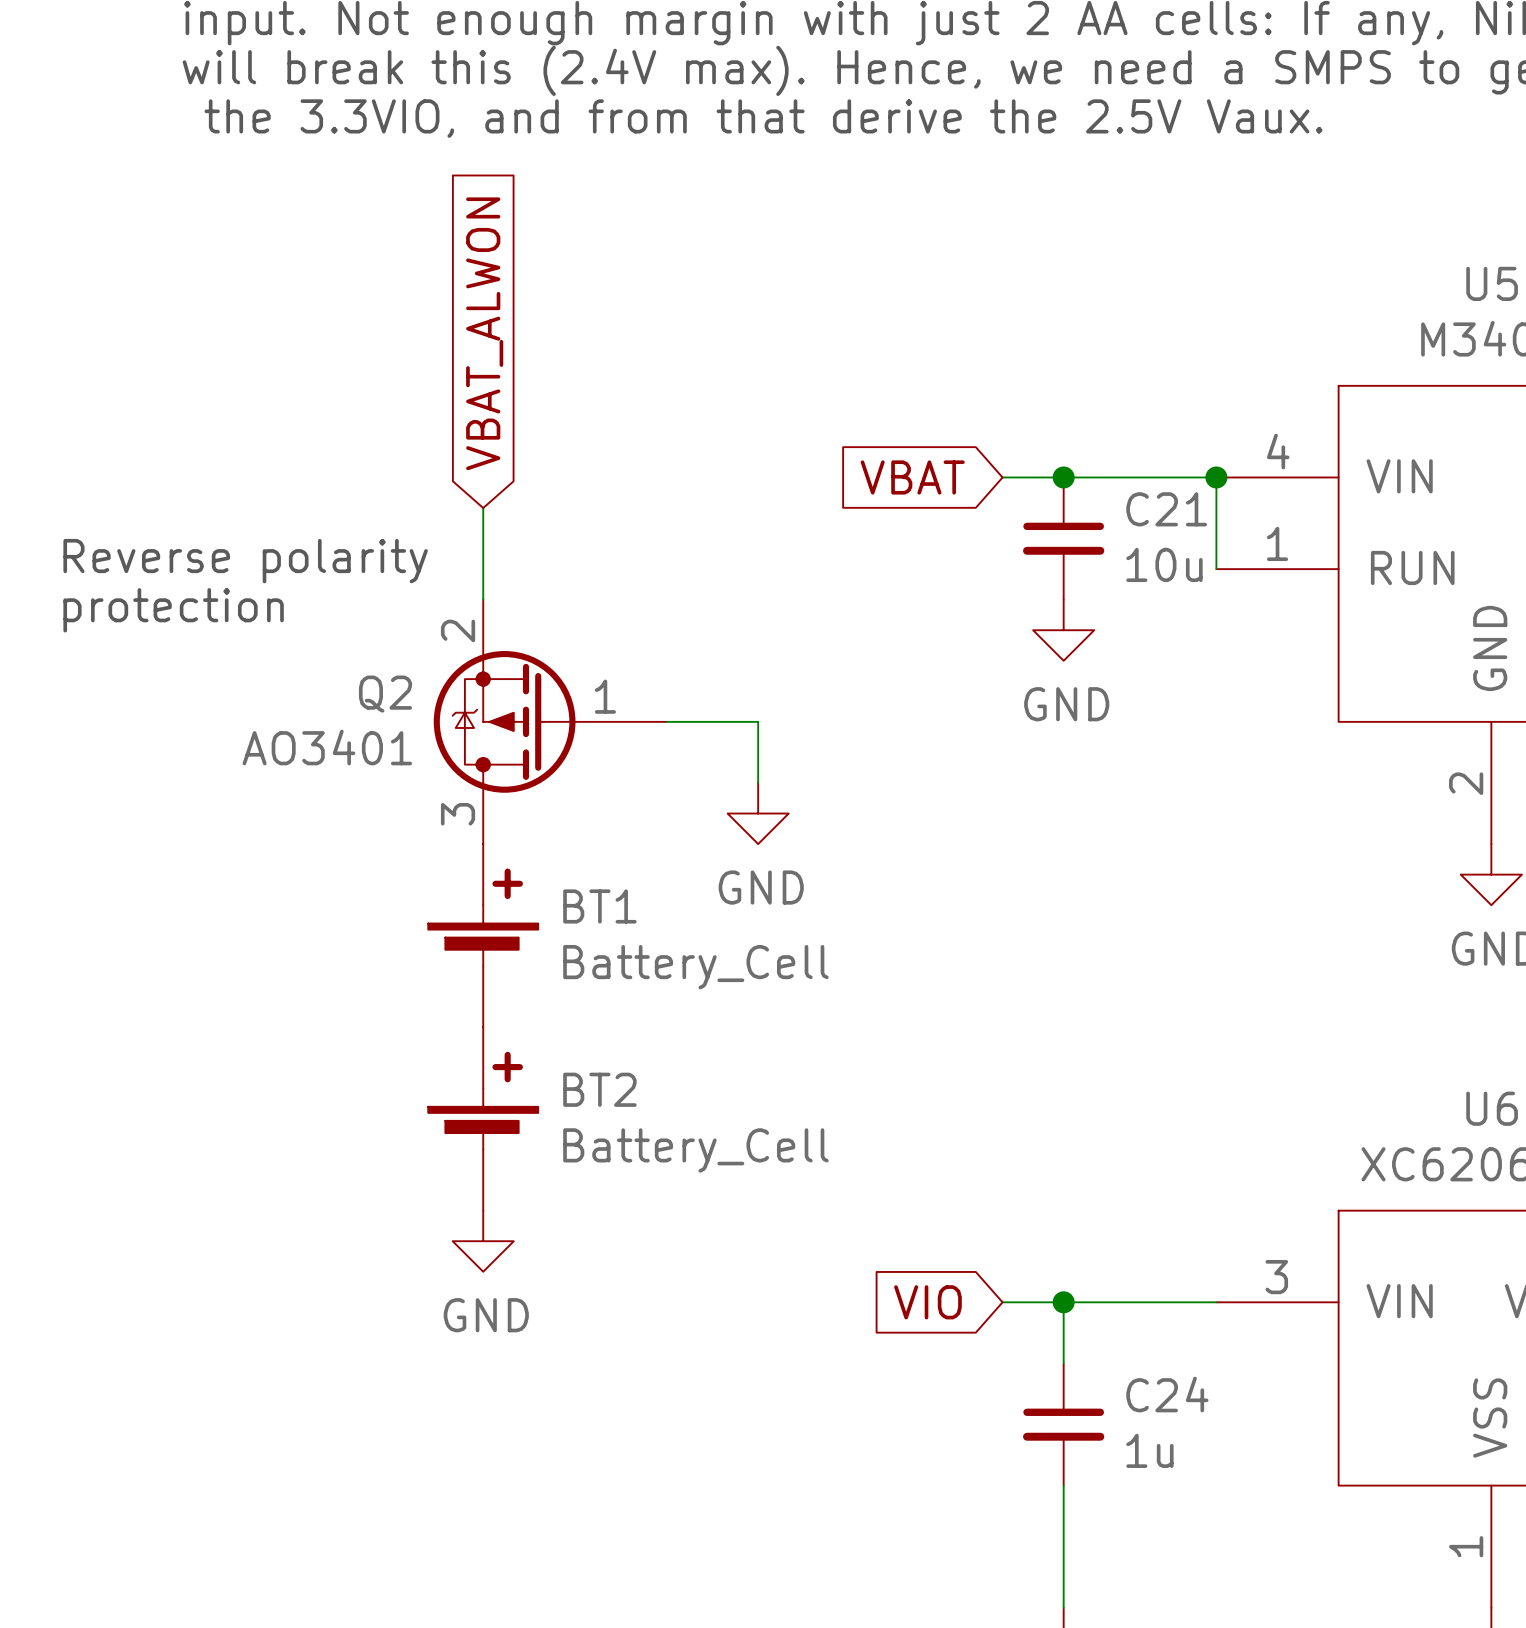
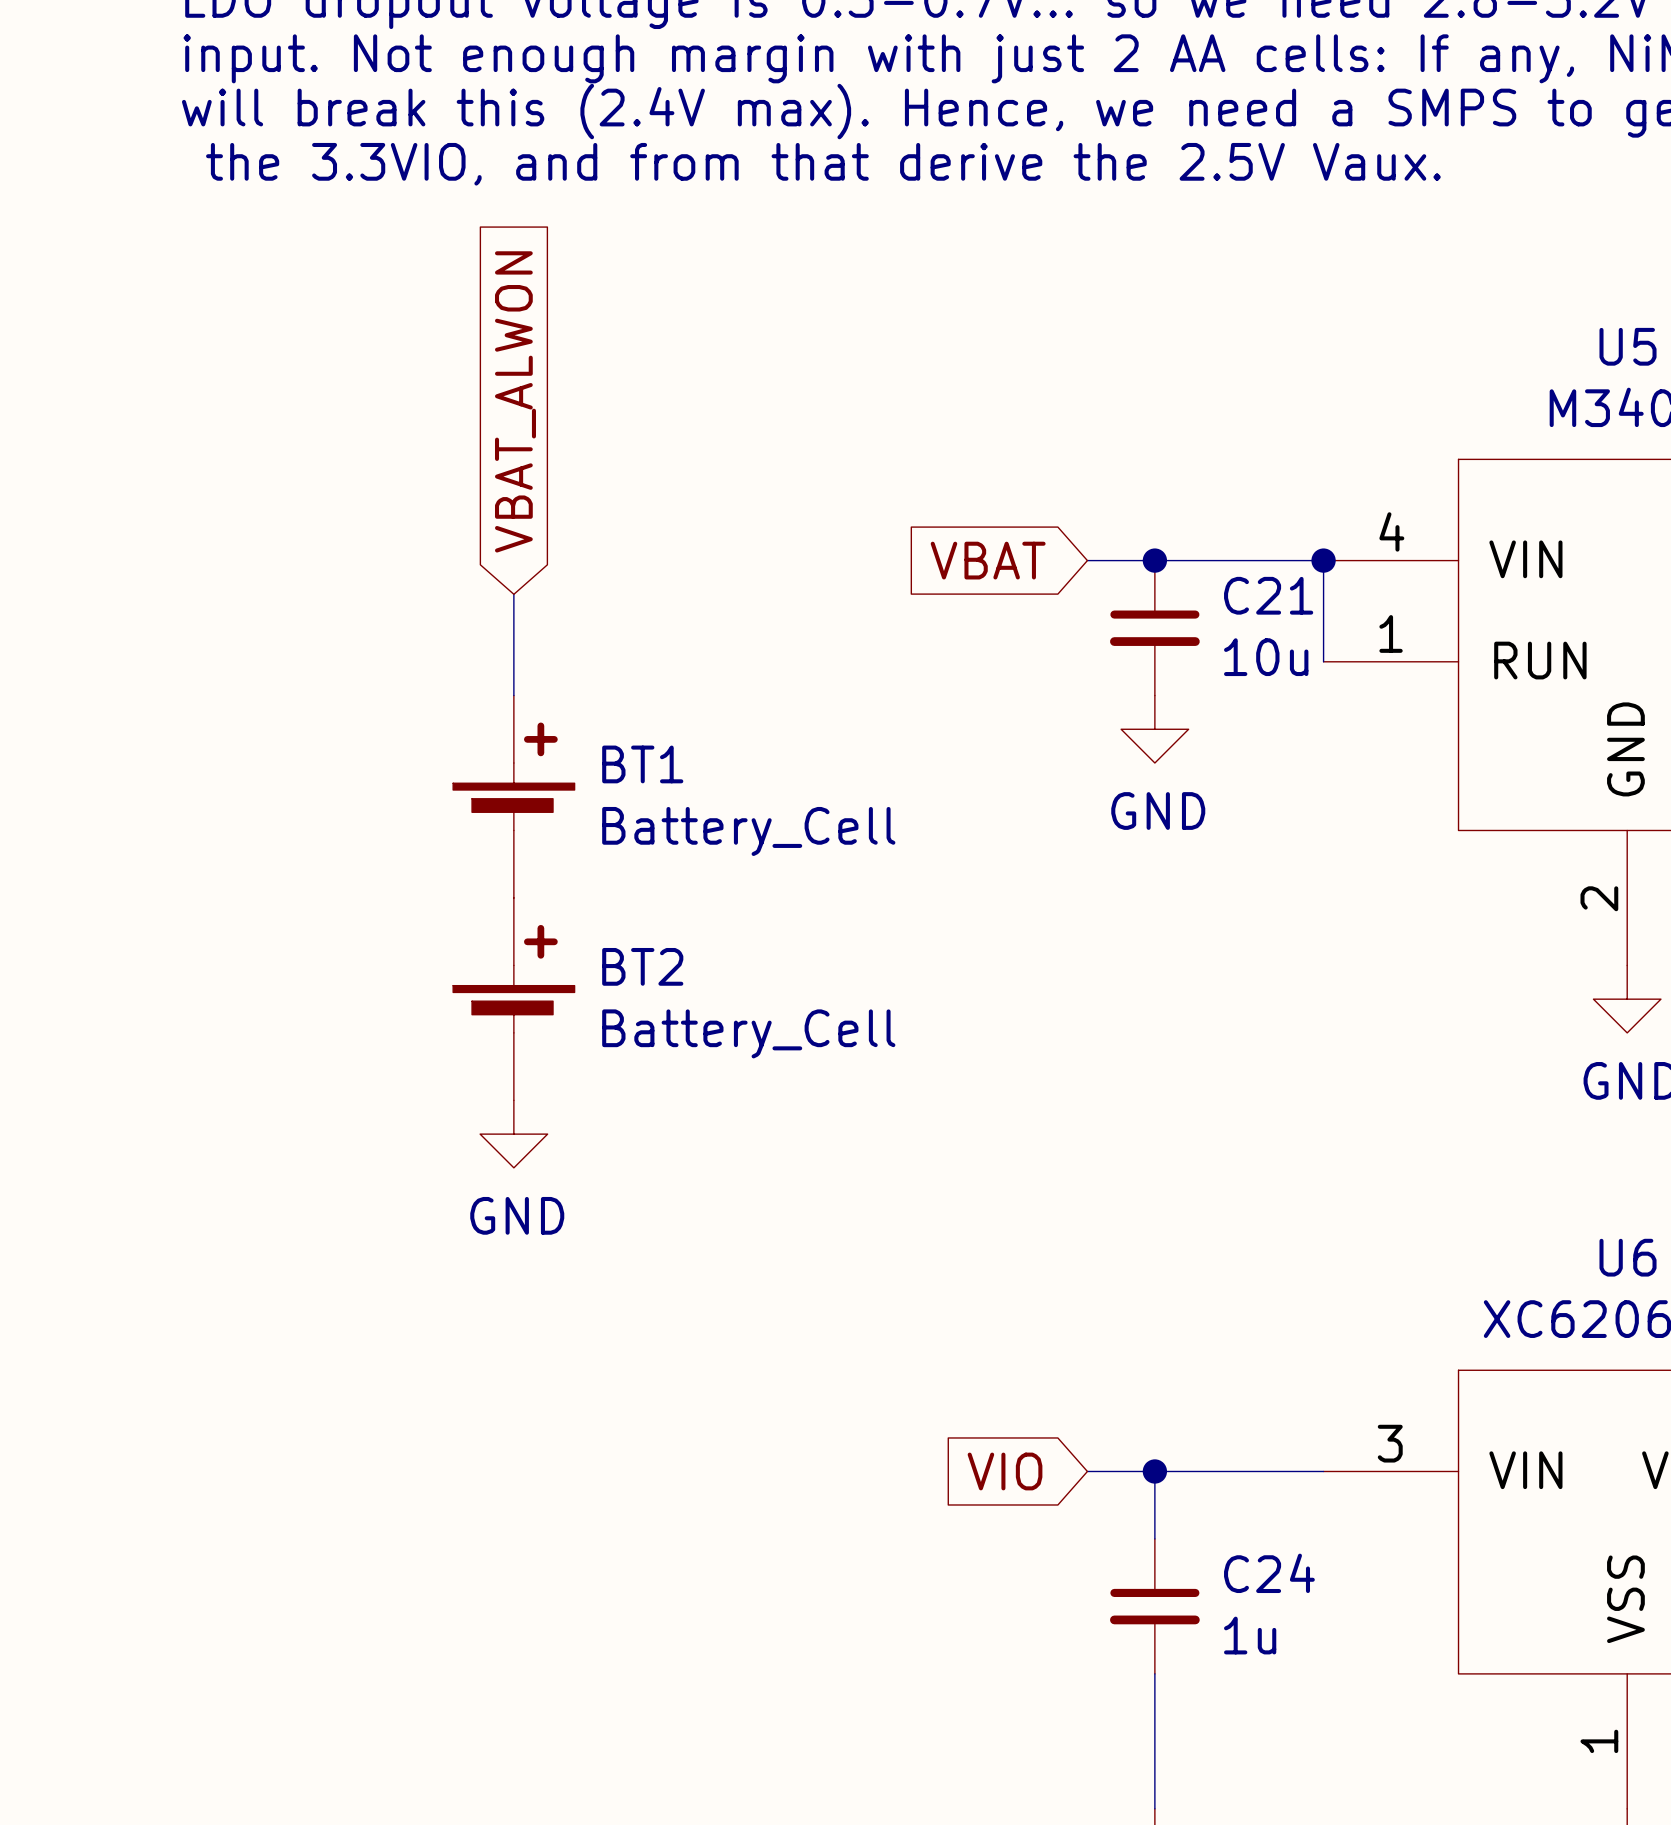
text: Reverse polarity (245, 561) -> none
text: protection (173, 610) -> none
Q2: AO3401 (550, 721) -> none
wire: (666, 721) (758, 721) (758, 782) -> none
power symbol: GND (758, 813) -> none
BT1 position: (483, 935) -> (513, 796)
power symbol: none -> GND (513, 1134)
BT2 position: (483, 1119) -> (513, 999)
power symbol: GND (483, 1241) -> none

